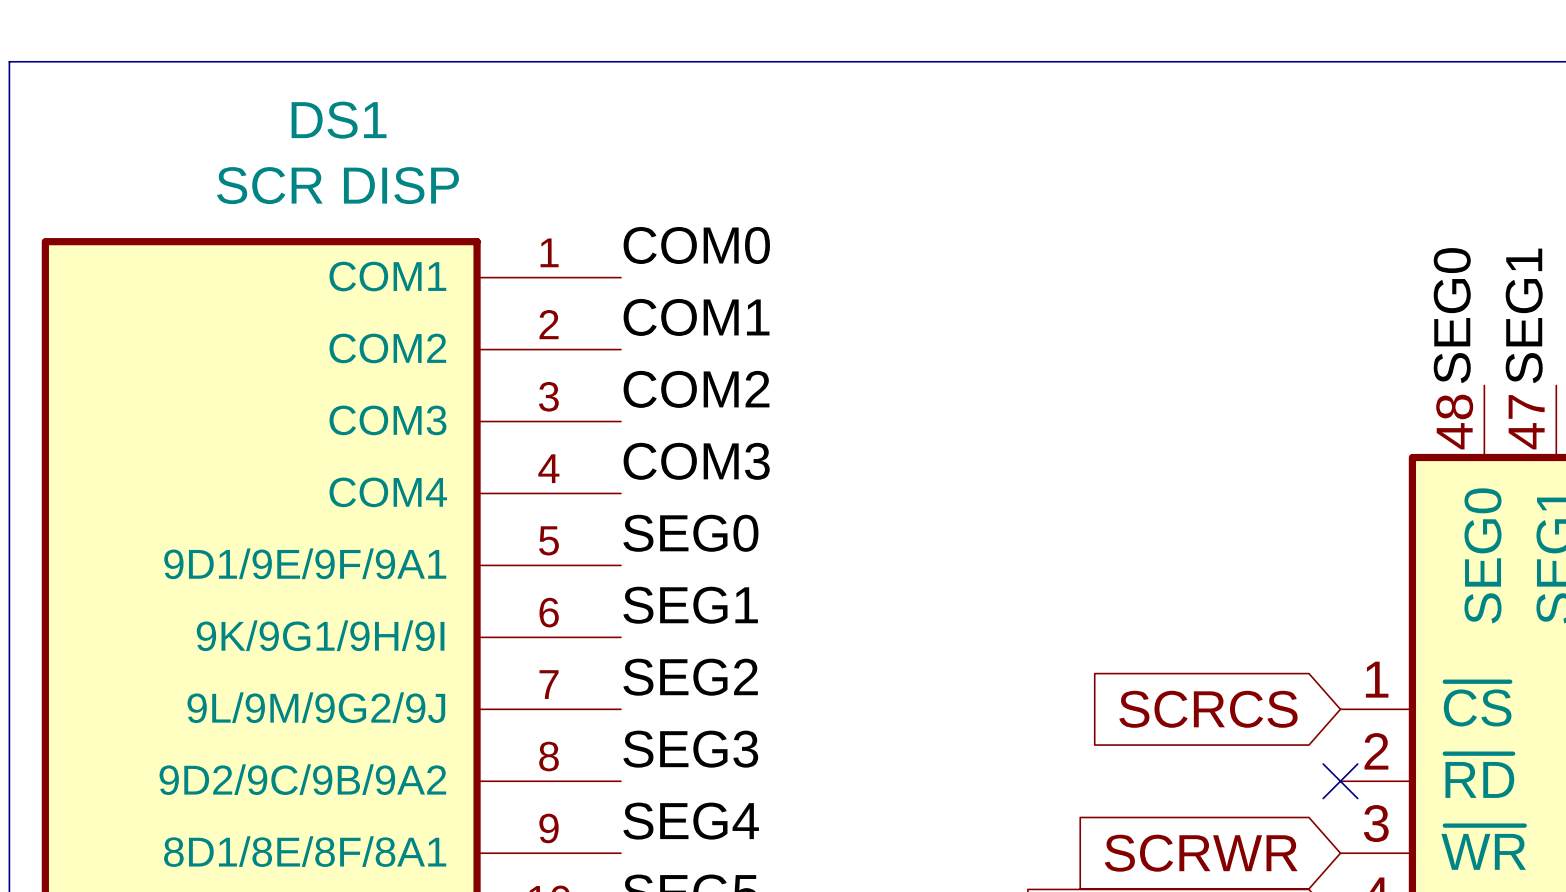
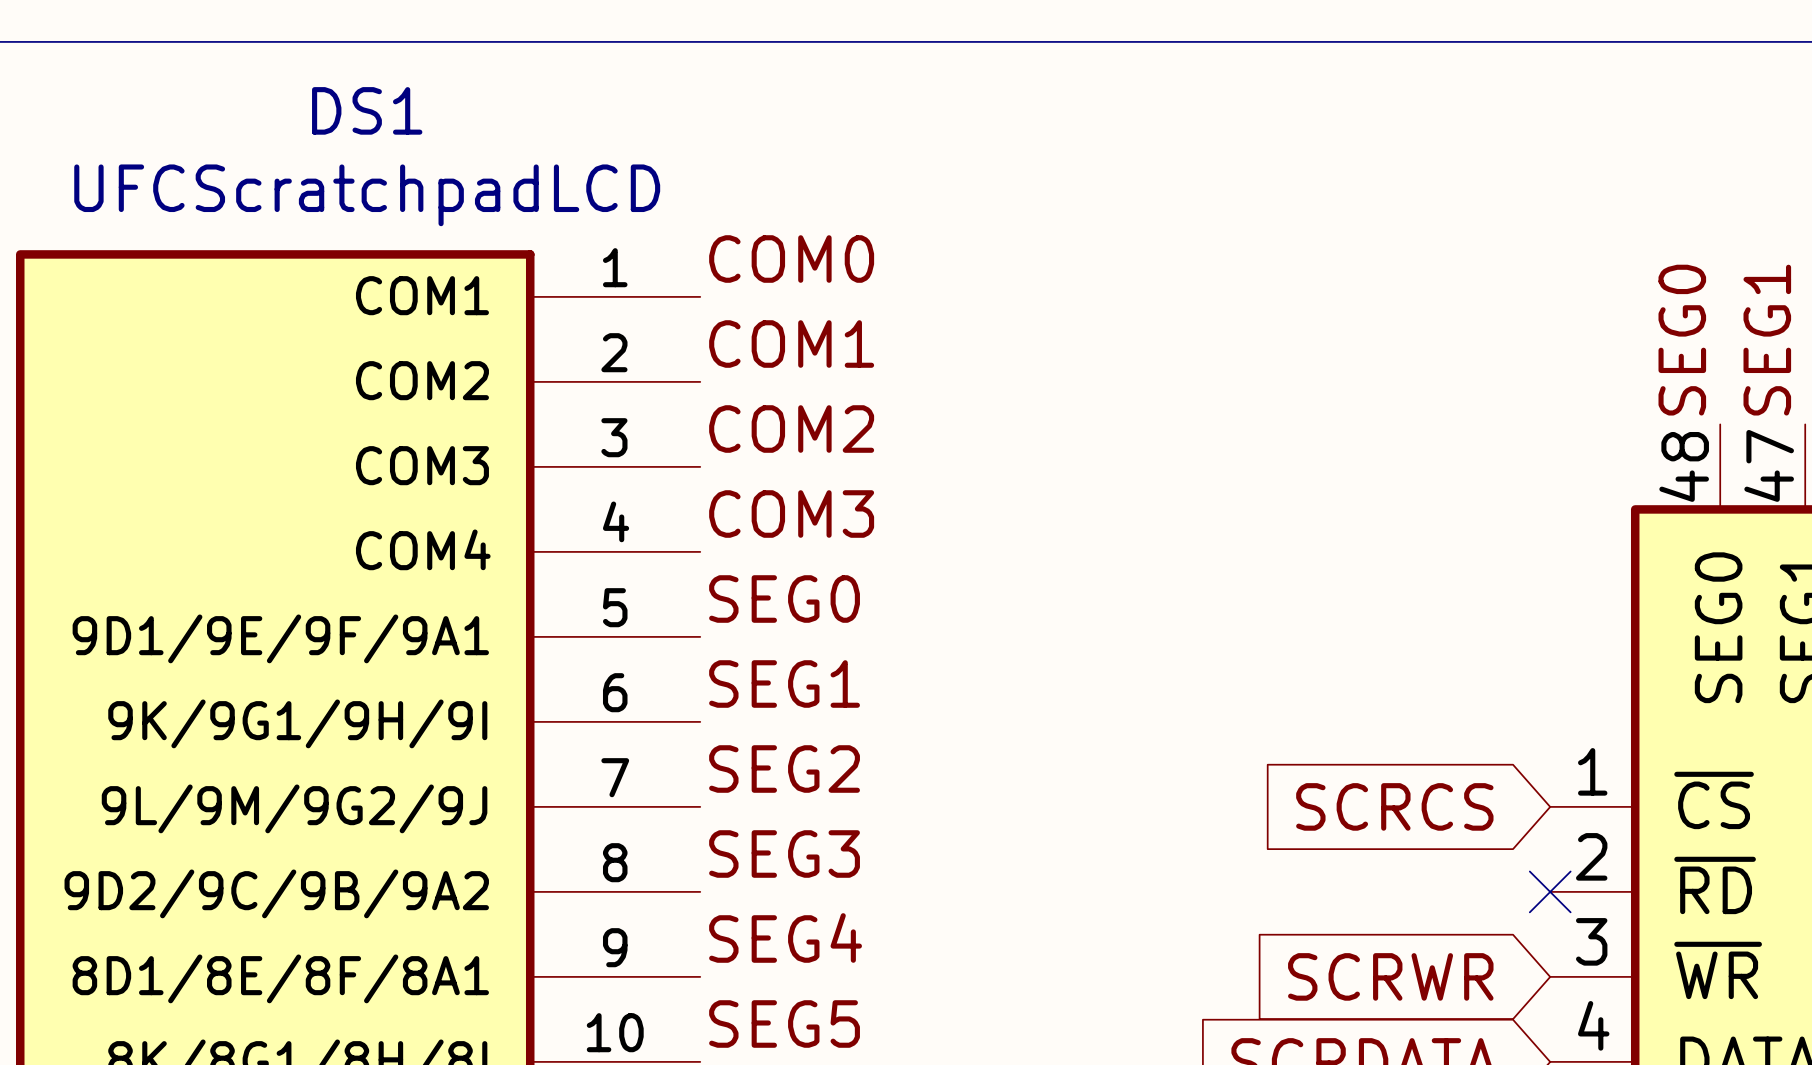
DS1 value: SCR DISP (338, 185) -> UFCScratchpadLCD (367, 195)

